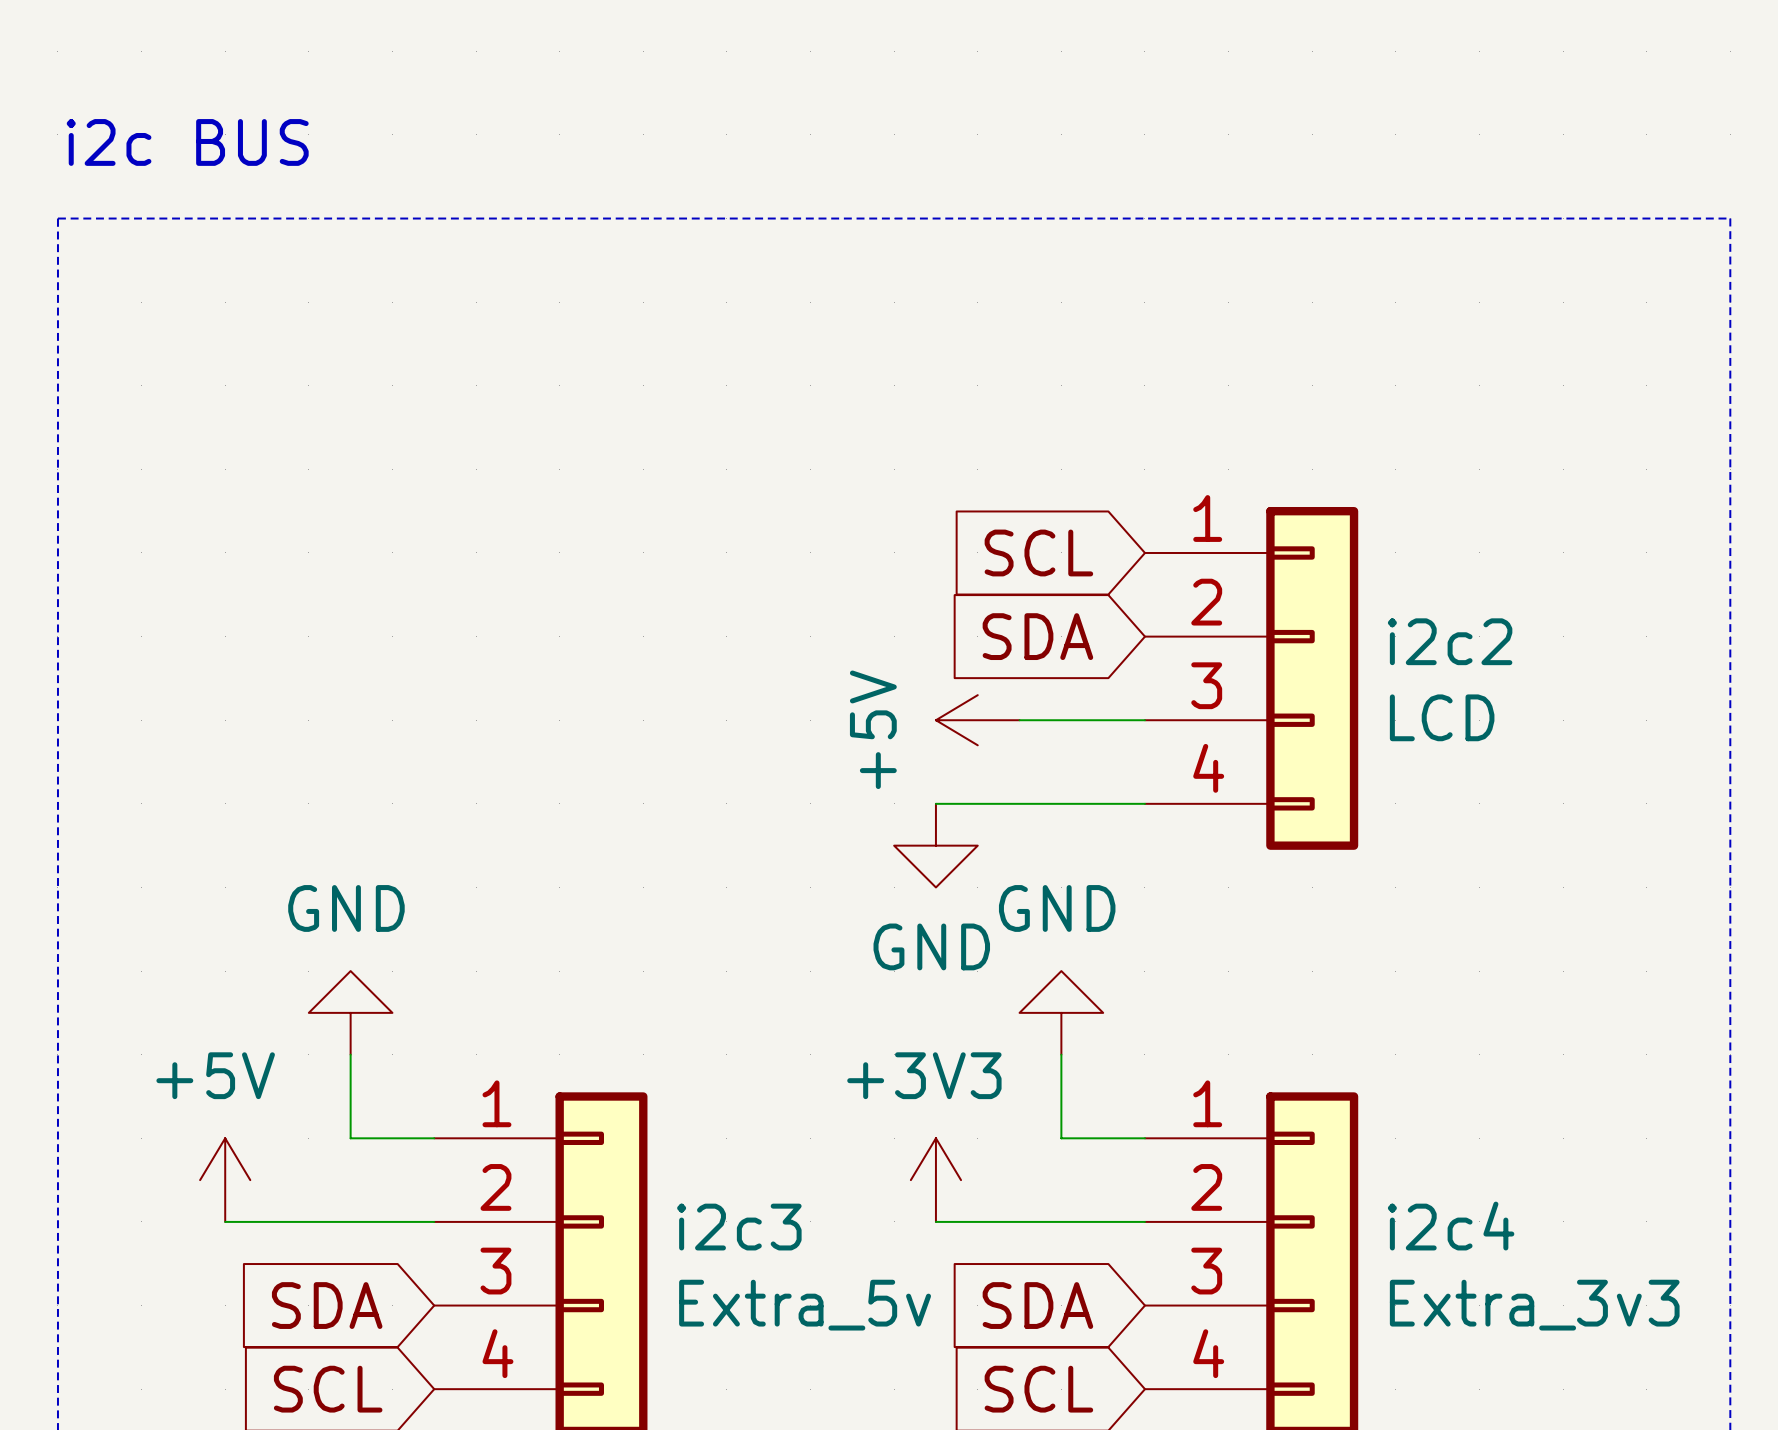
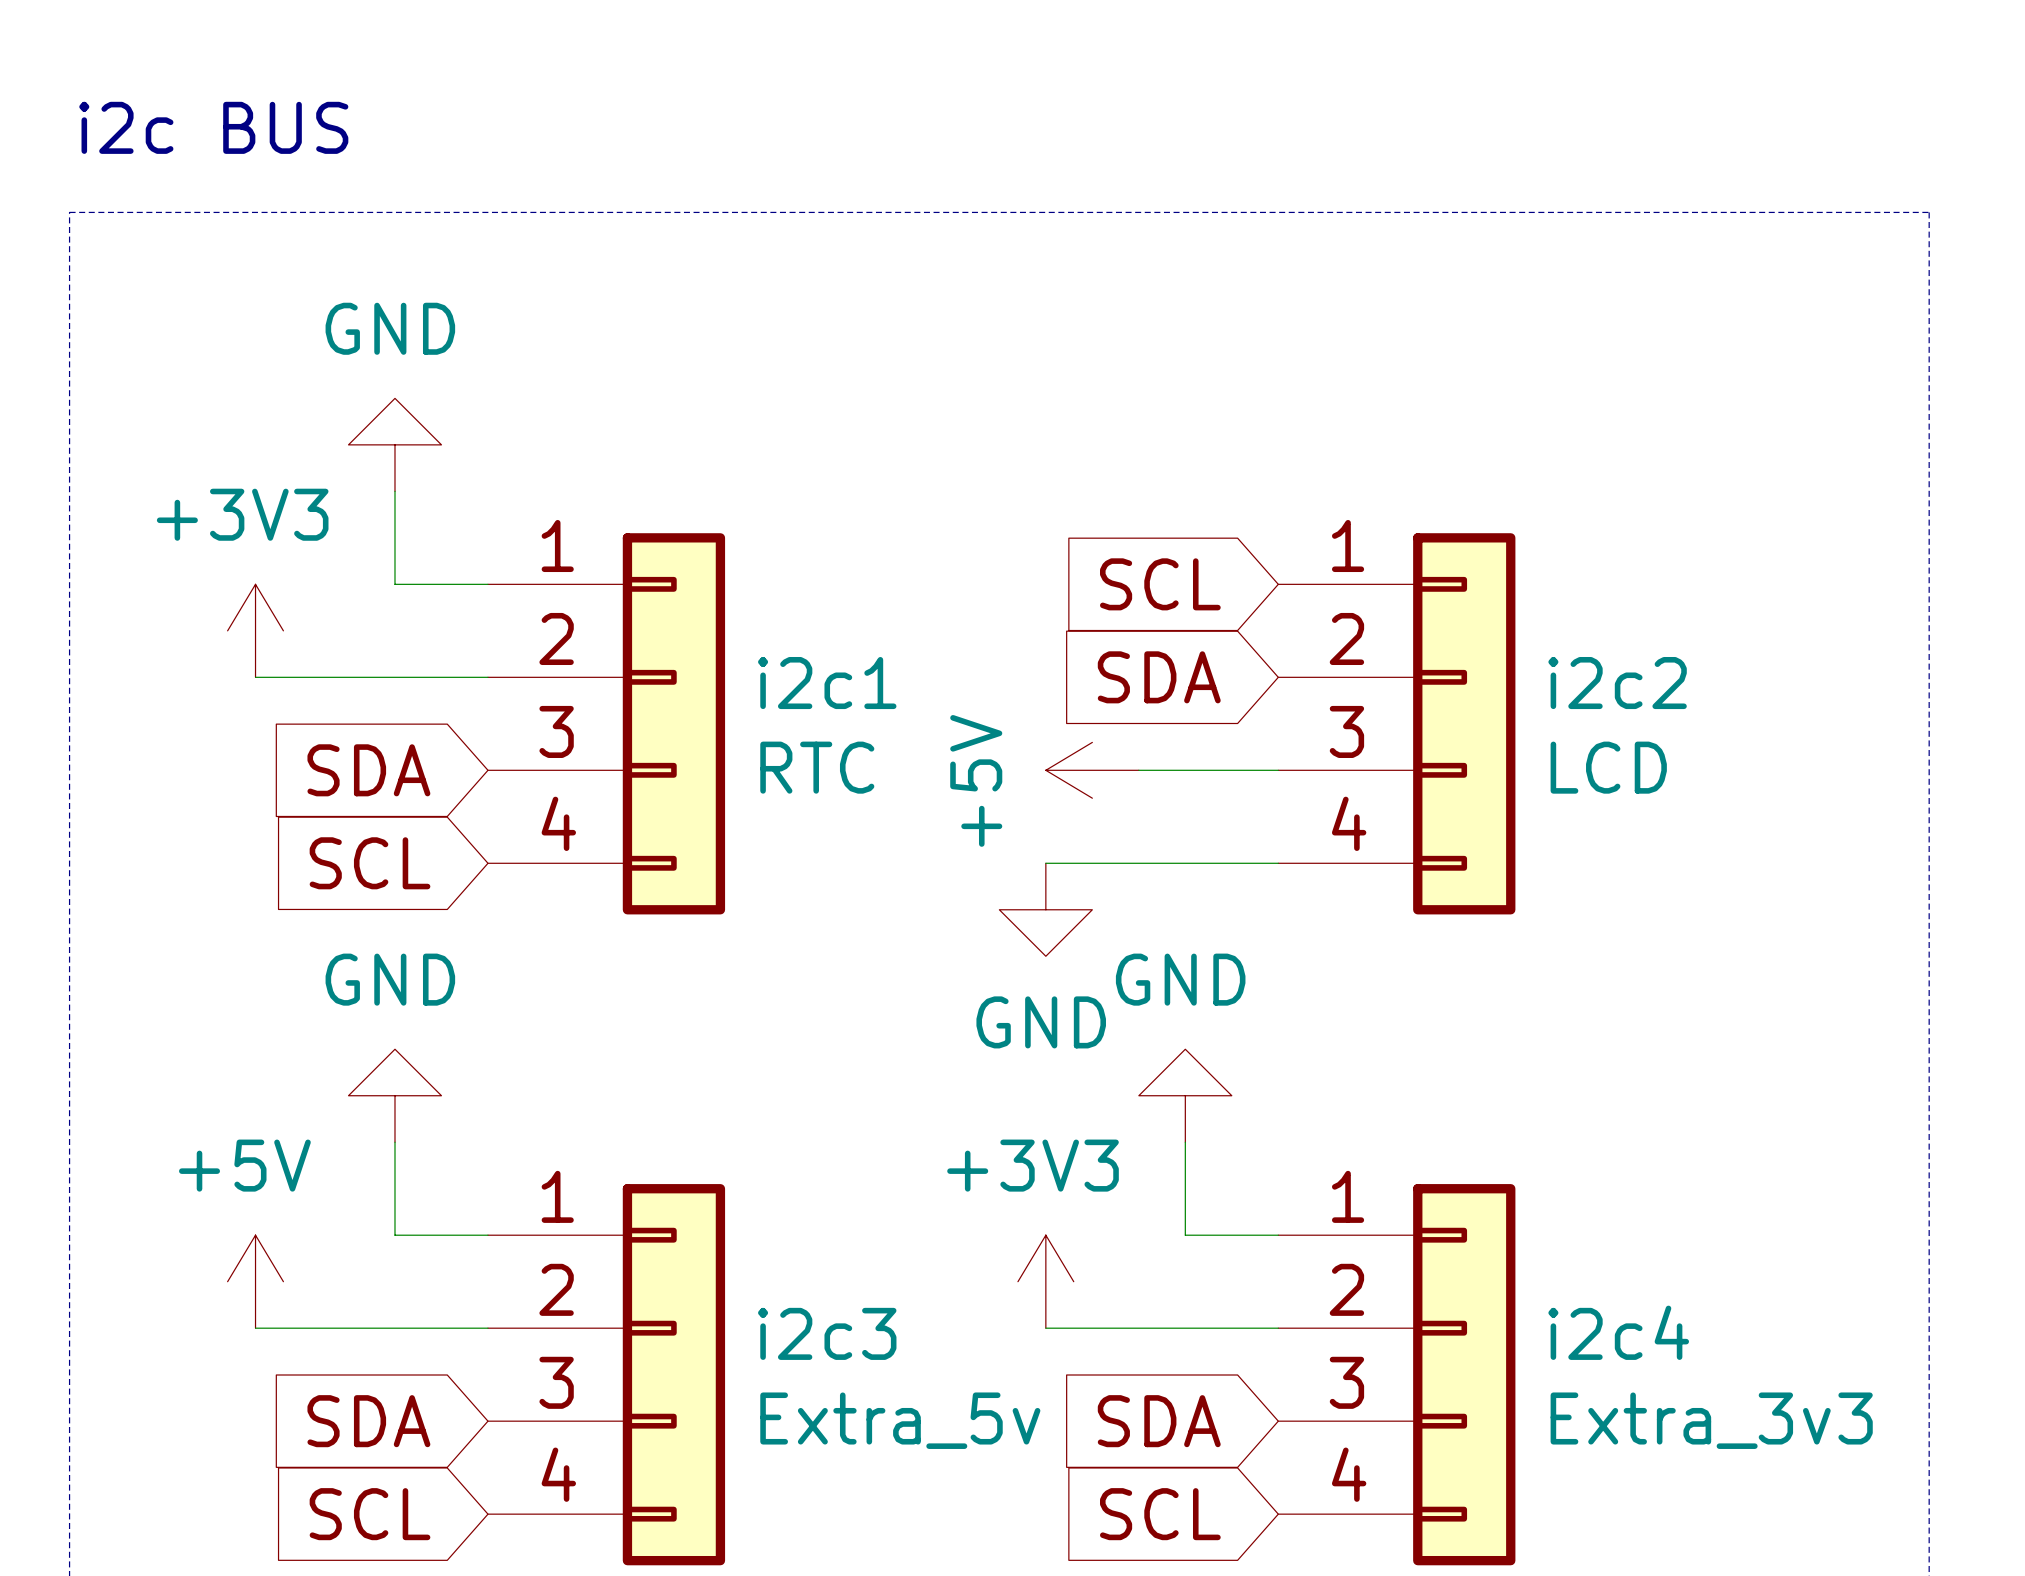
power symbol: none -> GND (394, 444)
wire: none -> (394, 491) (394, 584) (487, 584)
power symbol: none -> +3V3 (255, 630)
wire: none -> (255, 677) (487, 677)
i2c1: none -> RTC (606, 723)
global label: none -> SDA (368, 770)
global label: none -> SCL (370, 863)

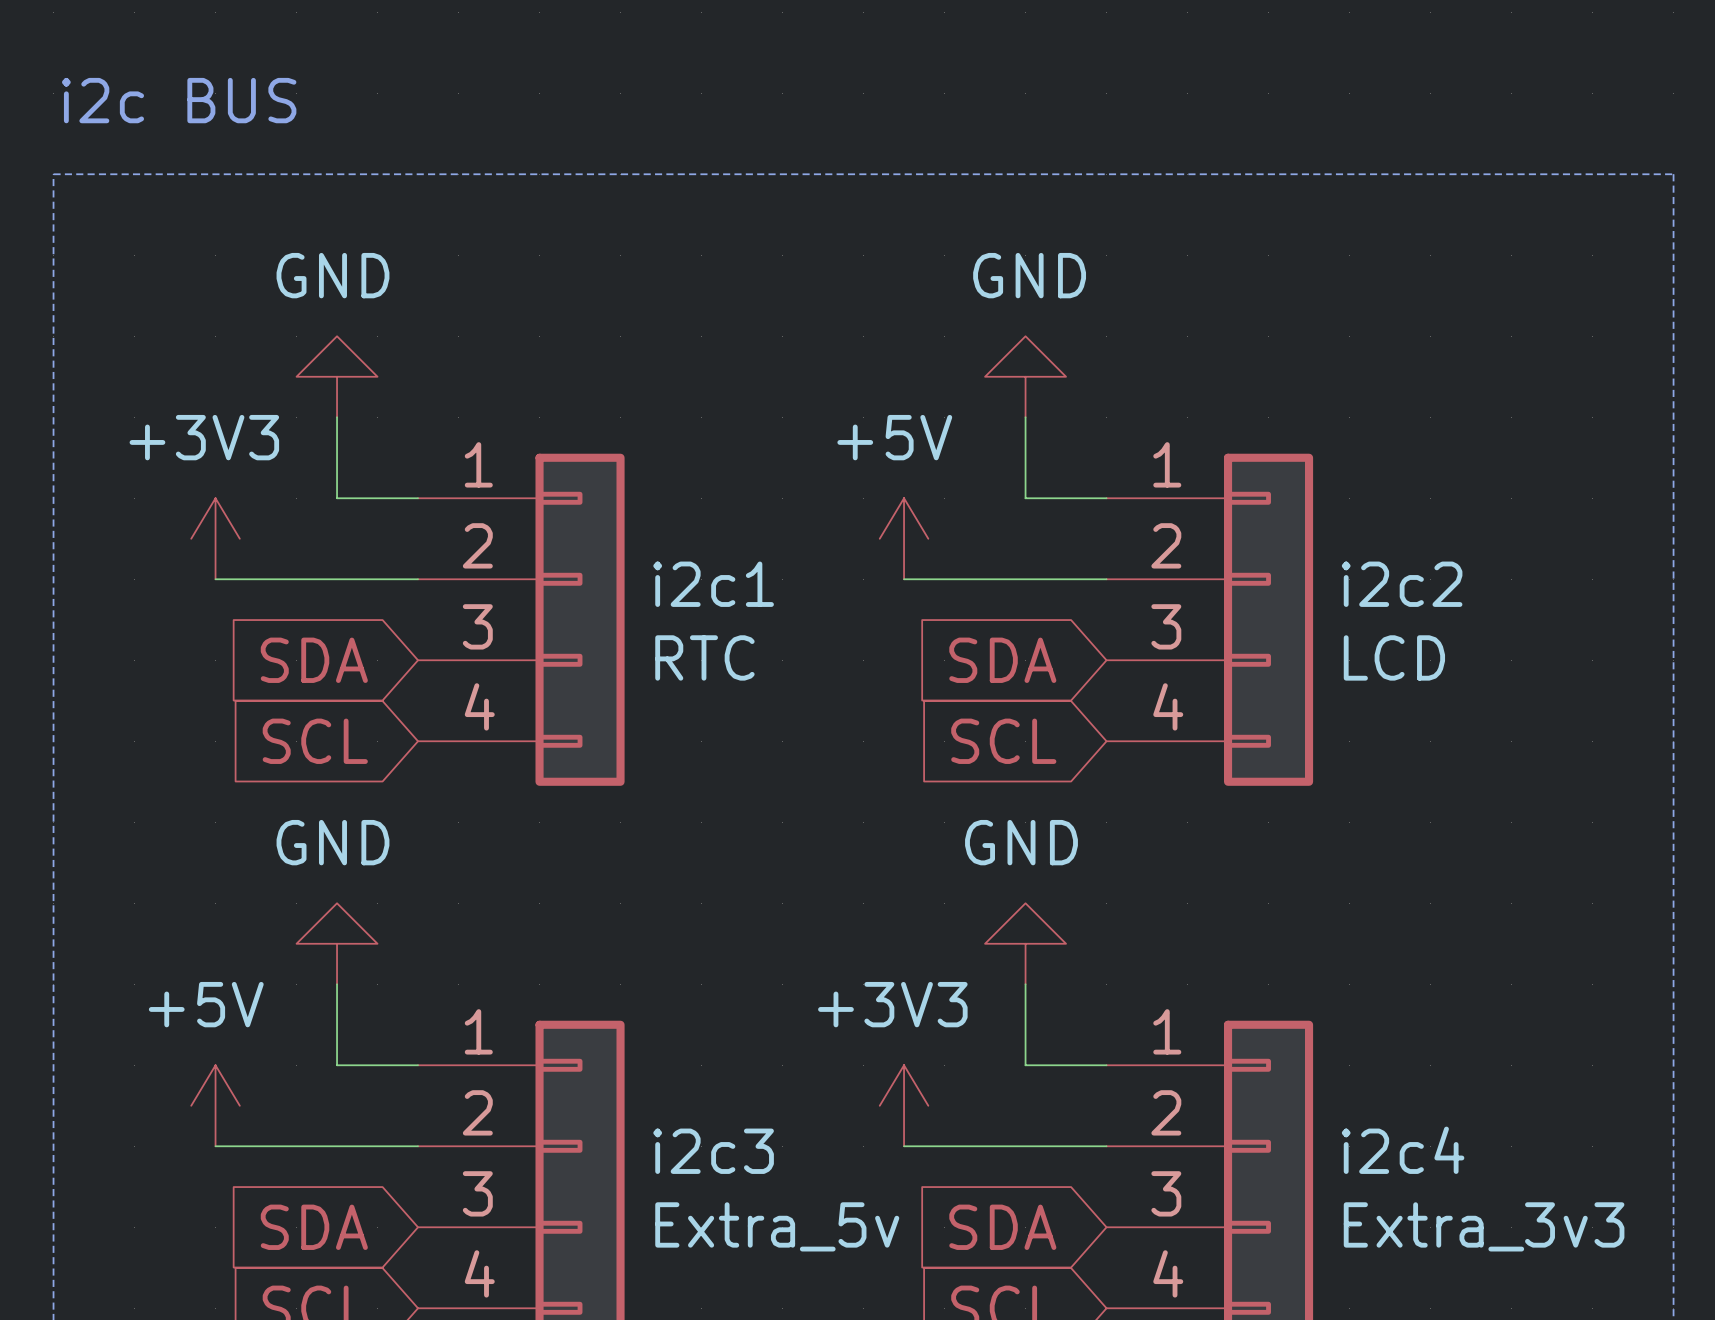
wire: none -> (1025, 417) (1025, 498) (1106, 498)
global label position: SCL (1160, 584) -> SCL (1003, 741)
global label position: SDA (1159, 677) -> SDA (1002, 660)
power symbol rotation: 0° (1092, 770) -> 90° clockwise (904, 538)
power symbol position: +5V (1092, 770) -> +5V (904, 538)
wire: (1138, 770) (1278, 770) -> none
wire: (1045, 863) (1278, 863) -> (904, 579) (1106, 579)
power symbol rotation: 0° (1045, 909) -> 180° (1025, 376)
power symbol position: GND (1045, 909) -> GND (1025, 376)

